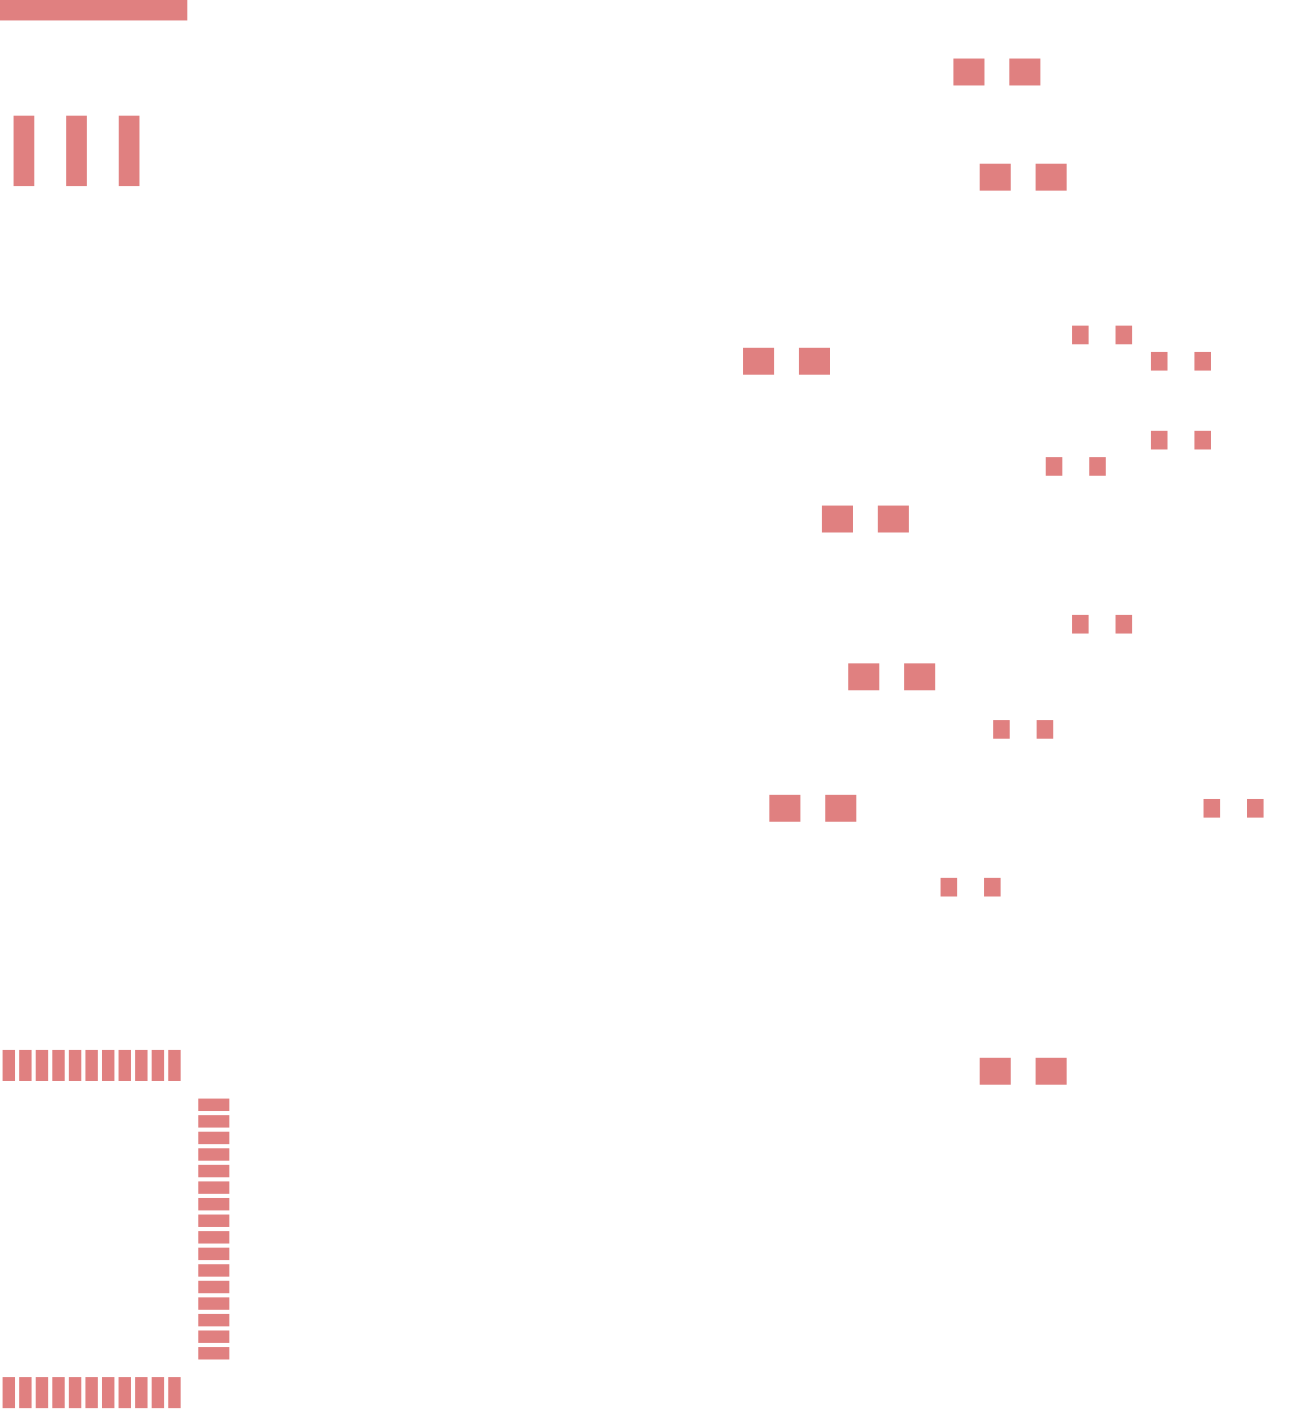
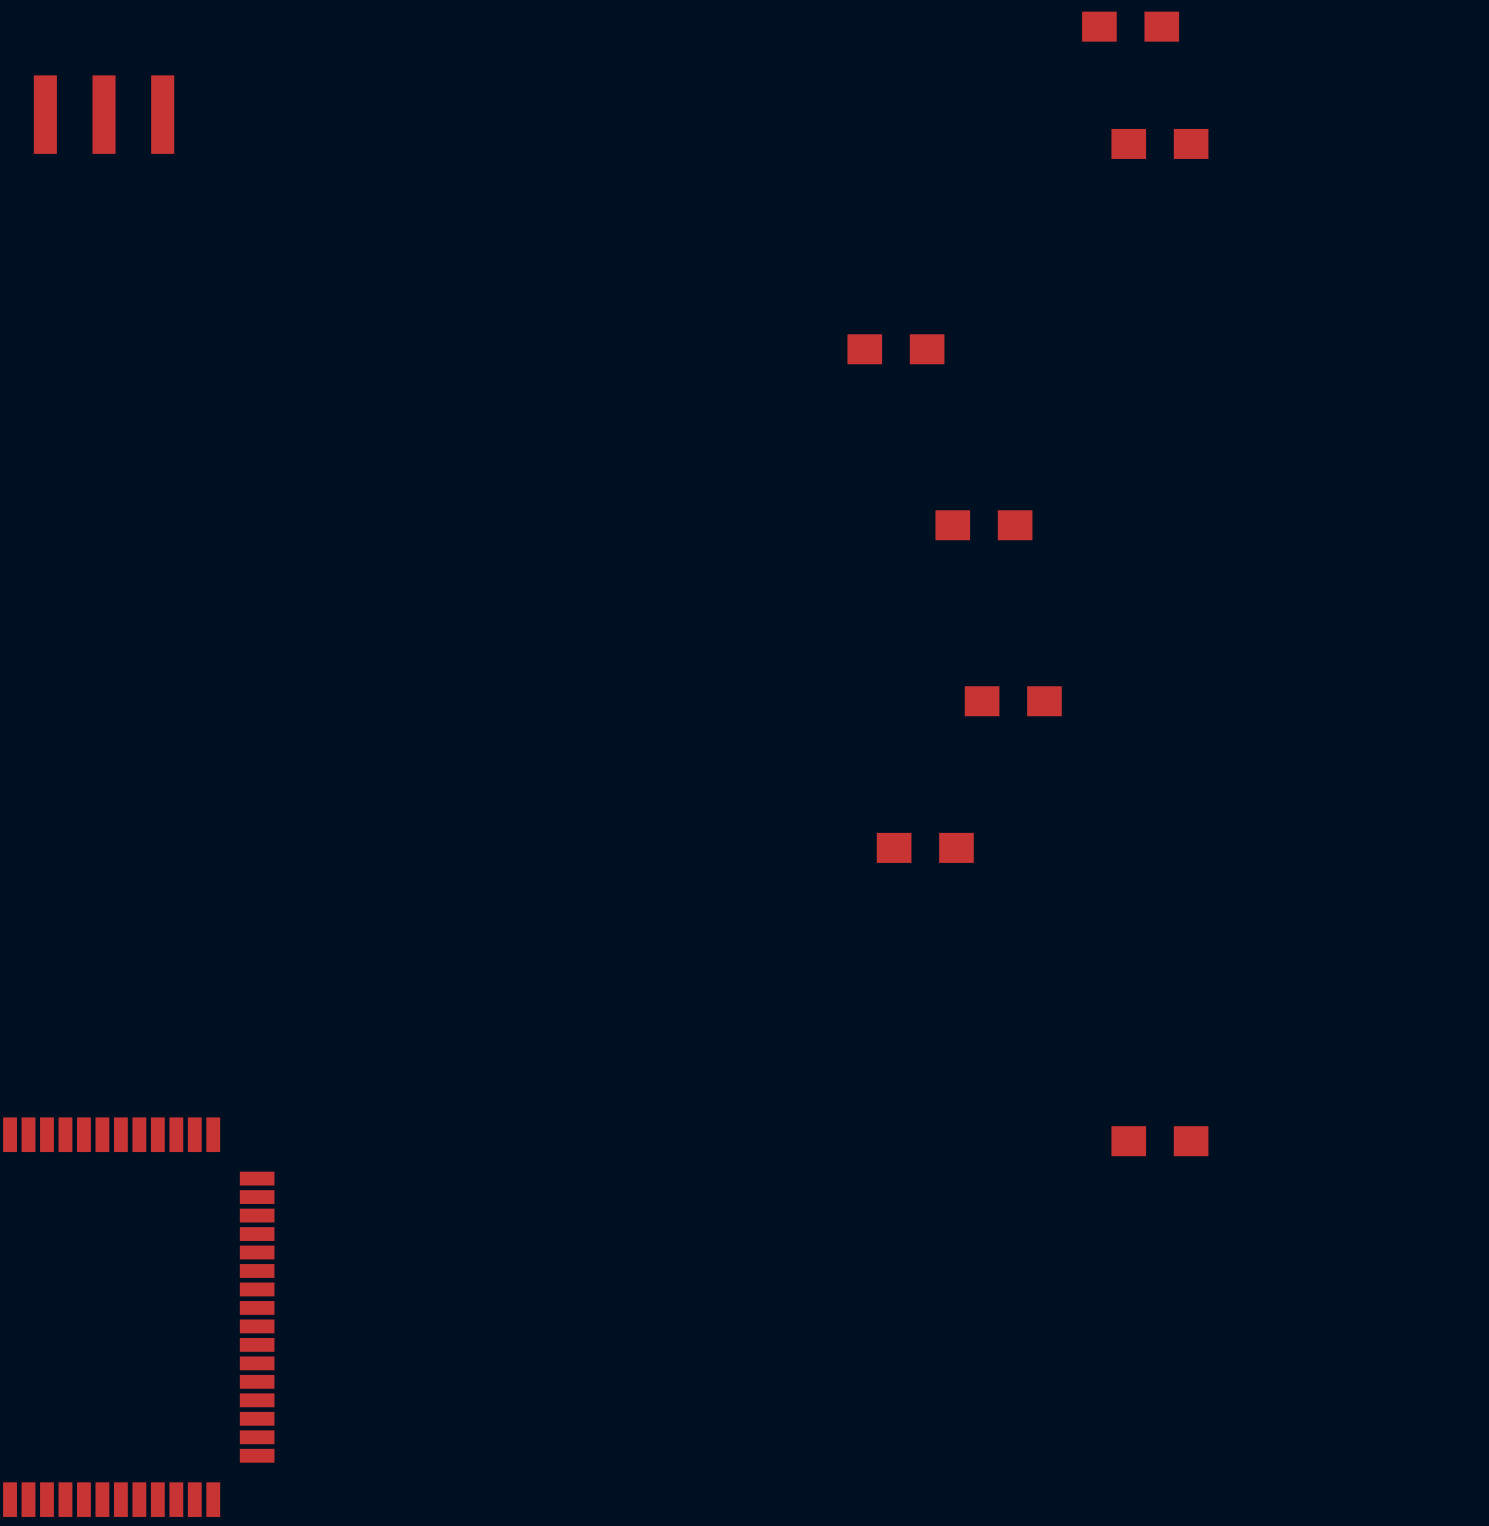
part: (1102, 334) -> none
part: (1180, 361) -> none
part: (1180, 440) -> none
part: (1075, 466) -> none
part: (1102, 624) -> none
part: (1023, 729) -> none
part: (1233, 808) -> none
part: (970, 887) -> none

